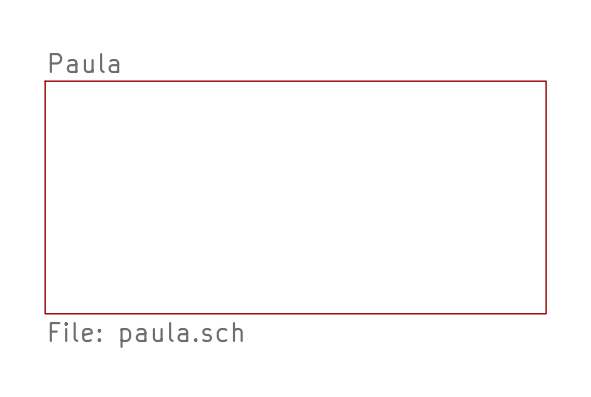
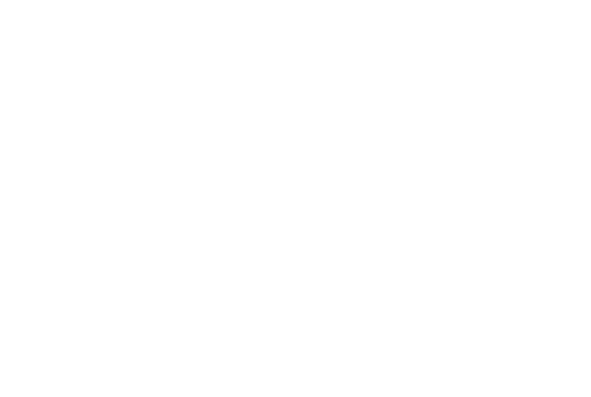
sheet Paula: File: paula.sch (295, 197) -> none

